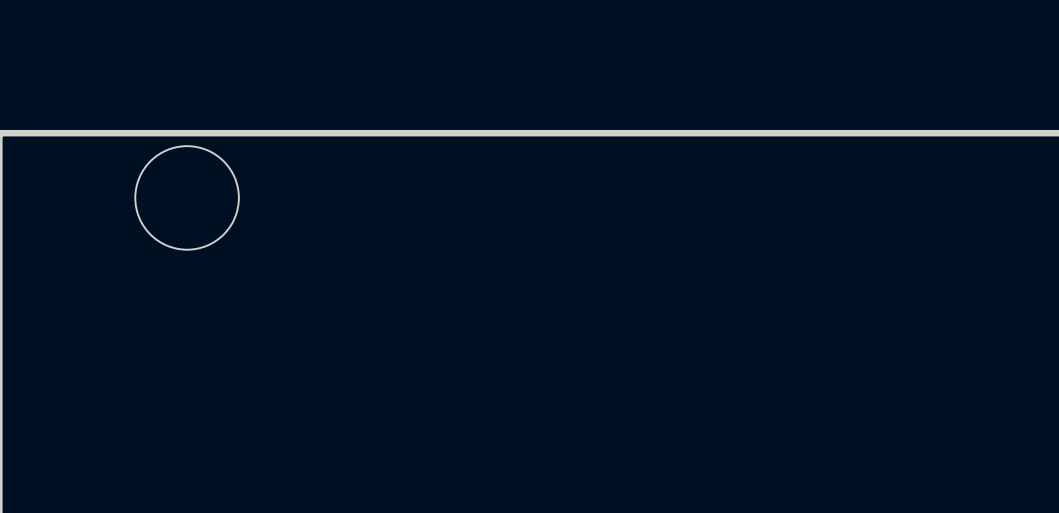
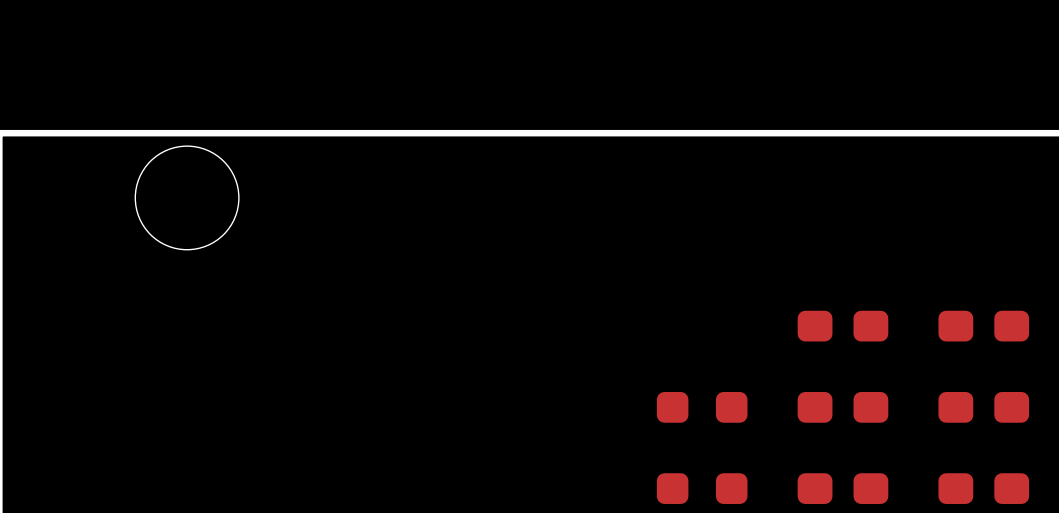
part: none -> (842, 326)
part: none -> (983, 326)
part: none -> (702, 407)
part: none -> (842, 407)
part: none -> (983, 407)
part: none -> (702, 488)
part: none -> (842, 488)
part: none -> (983, 488)

